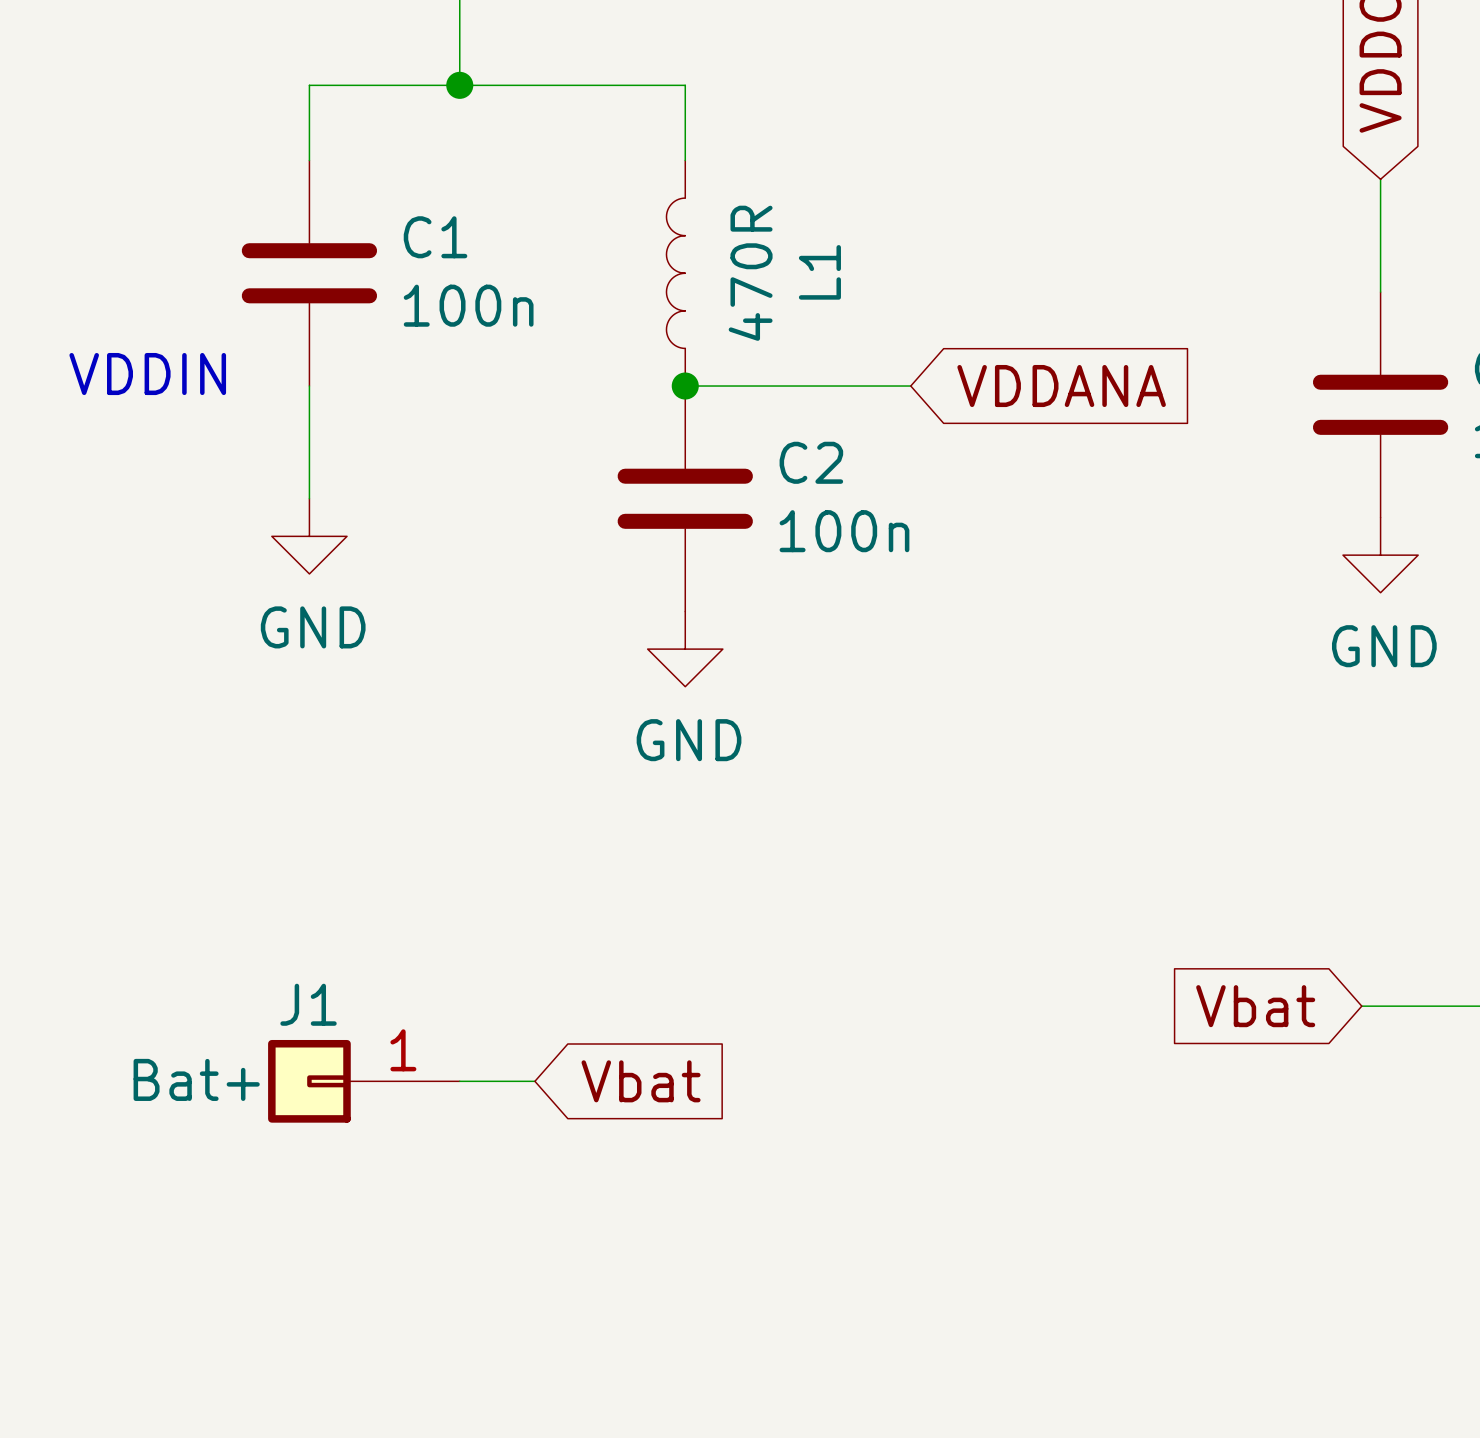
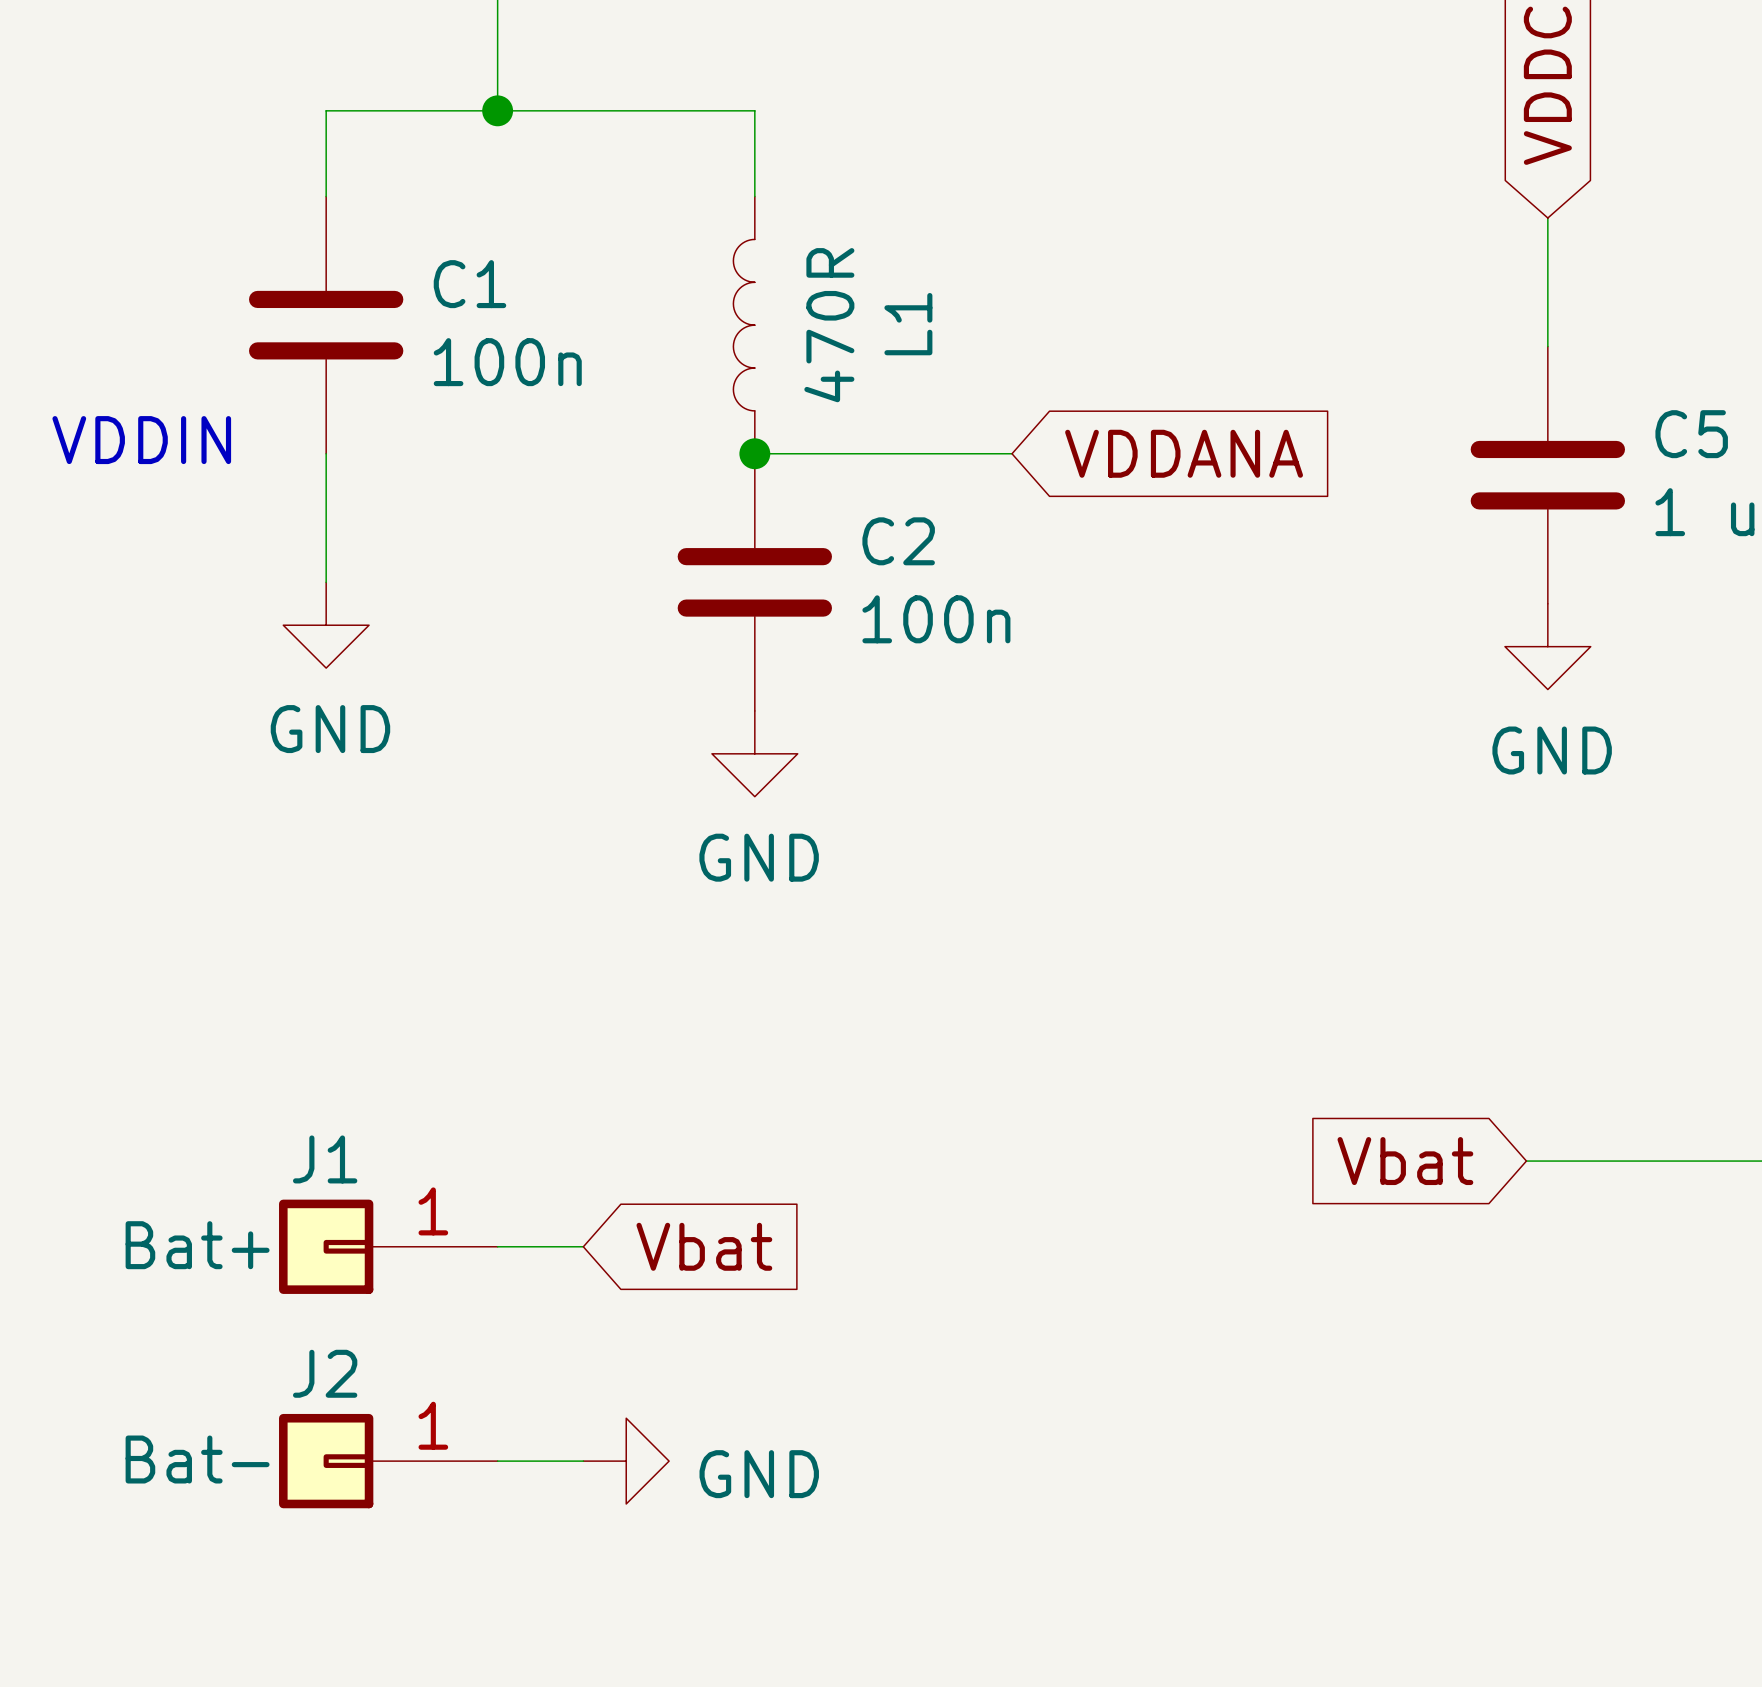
J2: none -> Bat- (388, 1461)
wire: none -> (497, 1461) (583, 1461)
power symbol: none -> GND (626, 1461)

